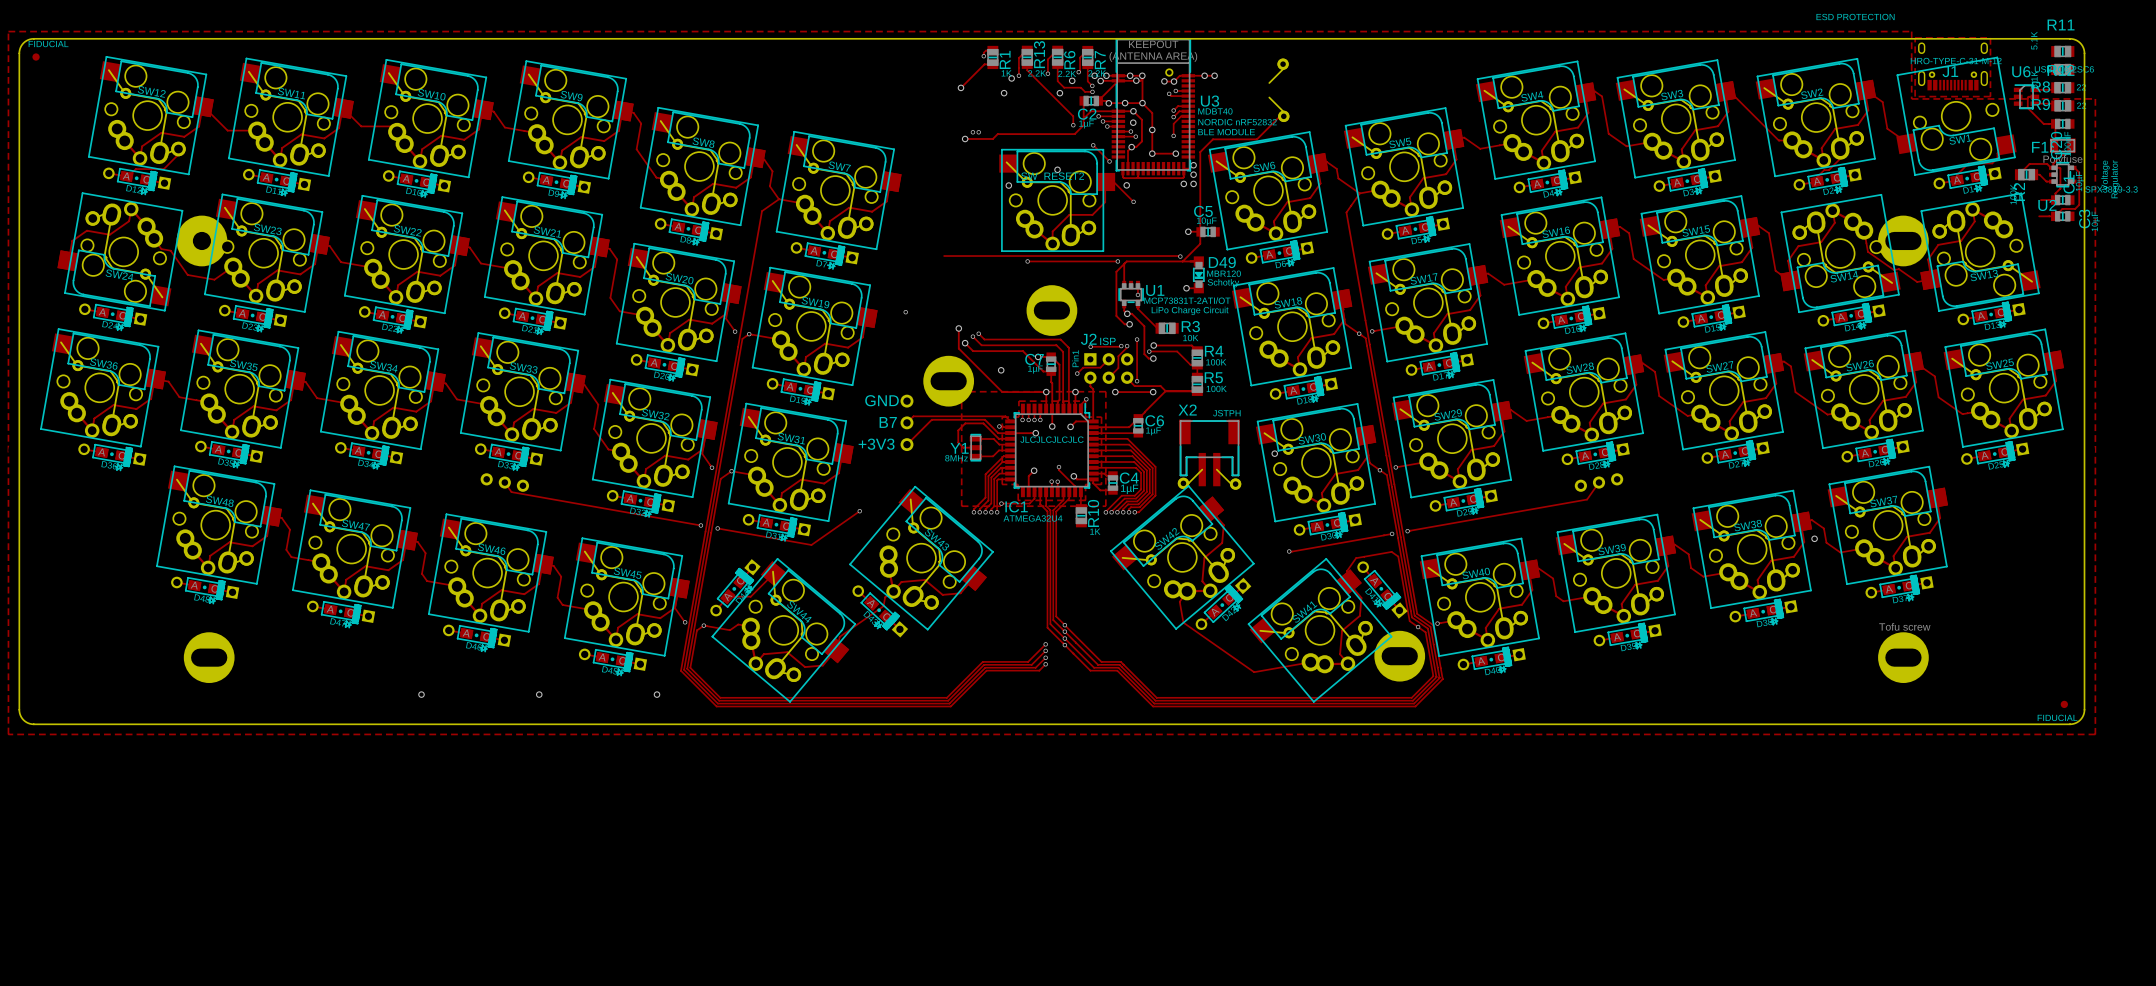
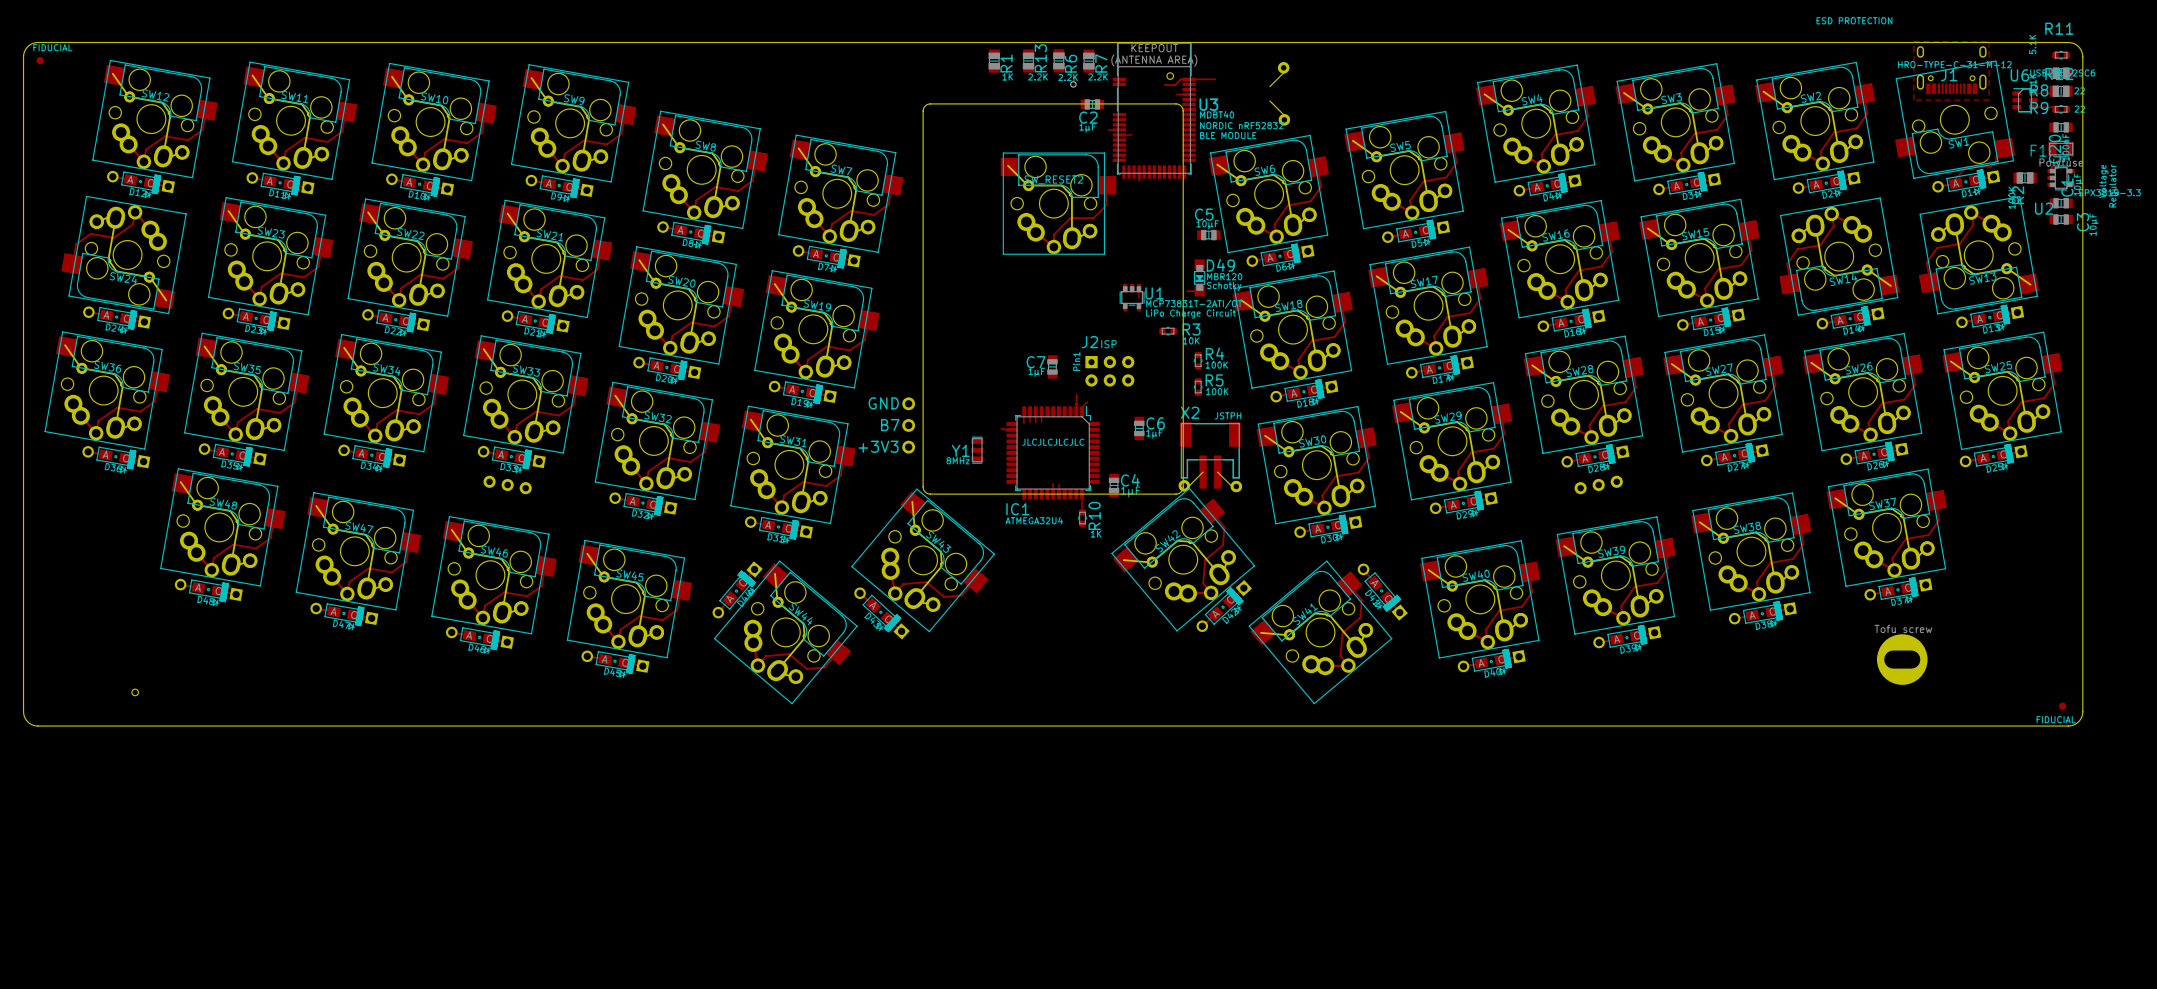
zone outline: (8, 31) (8, 734) (2095, 734) (2095, 98) (1911, 98) (1911, 31) (8, 31) -> none
R11 footprint: [2051, 45, 2075, 58] -> [2052, 51, 2070, 60]
track: (992, 50) (985, 50) (983, 56) -> none
track: (1027, 50) (1018, 58) (1018, 75) -> none
track: (1057, 50) (1047, 59) (1047, 73) -> none
track: (1087, 50) (1080, 57) (1078, 72) -> none
via: (983, 56) -> none
track: (992, 64) (984, 64) (960, 87) -> none
track: (1027, 64) (1027, 70) (1073, 116) (1073, 125) -> none
track: (1057, 64) (1057, 81) (1064, 87) (1080, 87) (1085, 91) (1092, 91) -> none
track: (1091, 67) (1087, 64) (1087, 81) (1092, 85) -> none
via: (1078, 72) -> none
via: (1047, 73) -> none
via: (1018, 75) -> none
via: (1094, 75) -> none
track: (1106, 75) (1142, 75) (1142, 103) (1152, 113) (1152, 153) (1175, 153) -> none
via: (1106, 75) -> none
via: (1130, 75) -> none
via: (1142, 75) -> none
via: (1204, 75) -> none
via: (1214, 75) -> none
via: (1011, 78) -> none
track: (1142, 78) (1140, 80) (1100, 80) -> none
track: (1118, 80) (1098, 100) (1106, 100) (1108, 103) -> none
via: (1136, 80) -> none
via: (1100, 81) -> none
via: (1164, 81) -> none
via: (1174, 81) -> none
via: (1092, 85) -> none
via: (960, 87) -> none
via: (1175, 90) -> none
track: (1865, 90) (1882, 102) (1887, 128) (1908, 143) -> none
via: (1092, 91) -> none
track: (1726, 91) (1729, 91) (1778, 140) (1792, 140) -> none
track: (1586, 92) (1594, 91) (1602, 96) (1608, 133) (1626, 146) (1652, 141) -> none
via: (1004, 93) -> none
via: (1059, 93) -> none
track: (1169, 93) (1171, 96) (1188, 96) -> none
via: (1169, 93) -> none
track: (2034, 96) (2027, 97) (2027, 108) (2043, 123) (2055, 123) (2054, 145) -> none
track: (1083, 99) (1083, 118) -> none
board edge: none -> (930, 103) (1176, 103) (1182, 107) (1183, 486) (1179, 493) (930, 494) (924, 490) (923, 111) (925, 106) (930, 103)
R9 footprint: [2051, 100, 2075, 112] -> [2052, 105, 2070, 114]
via: (1108, 103) -> none
track: (1109, 103) (1142, 103) -> none
via: (1125, 103) -> none
via: (1142, 103) -> none
track: (1188, 106) (1178, 106) (1173, 110) -> none
track: (204, 107) (227, 130) (257, 130) -> none
track: (343, 108) (361, 126) (393, 126) (397, 131) -> none
track: (483, 109) (493, 111) (504, 127) (537, 133) -> none
via: (1173, 110) -> none
track: (623, 111) (633, 112) (641, 123) (636, 149) (656, 177) (669, 179) -> none
via: (1133, 111) -> none
track: (1188, 111) (1179, 111) (1173, 117) -> none
track: (1098, 116) (1118, 116) -> none
via: (1098, 116) -> none
track: (1188, 116) (1181, 116) (1173, 123) (1173, 135) -> none
track: (1283, 116) (1279, 116) (1256, 139) (1212, 139) (1200, 152) (1200, 243) (1182, 261) -> none
via: (1173, 117) -> none
via: (1102, 121) -> none
track: (1103, 121) (1118, 121) -> none
via: (1133, 122) -> none
via: (1073, 125) -> none
track: (1083, 125) (1074, 134) (997, 134) (992, 138) (965, 138) -> none
track: (1083, 125) (1083, 118) (1091, 111) (1133, 111) (1141, 119) (1141, 141) (1136, 147) (1131, 147) -> none
via: (1107, 126) -> none
via: (1152, 129) -> none
via: (1130, 131) -> none
via: (972, 132) -> none
via: (978, 132) -> none
via: (1173, 135) -> none
track: (1118, 136) (1135, 136) -> none
via: (1135, 136) -> none
via: (965, 138) -> none
track: (1453, 139) (1464, 137) (1480, 148) (1512, 143) -> none
track: (1093, 145) (1109, 161) -> none
via: (1093, 145) -> none
track: (1131, 146) (1128, 150) (1128, 168) -> none
via: (1131, 147) -> none
track: (1840, 148) (1840, 158) (1828, 170) (1824, 170) (1817, 177) (1817, 181) -> none
track: (178, 149) (178, 154) (163, 169) (135, 169) (126, 176) -> none
via: (1152, 153) -> none
via: (1175, 153) -> none
track: (756, 158) (764, 159) (772, 171) (769, 186) (778, 199) (804, 203) -> none
via: (1109, 161) -> none
track: (1318, 163) (1327, 162) (1336, 168) (1338, 178) (1359, 193) (1380, 189) -> none
track: (1193, 165) (1190, 168) (1183, 168) (1182, 178) (1123, 178) (1122, 168) -> none
via: (1193, 165) -> none
track: (2072, 167) (2079, 172) (2079, 204) (2075, 208) (2062, 208) (2055, 216) (2039, 216) -> none
via: (1057, 169) -> none
via: (1193, 174) -> none
track: (2019, 174) (2029, 163) (2047, 163) (2050, 167) (2060, 168) (2060, 188) (2055, 193) (2055, 200) (2041, 200) -> none
track: (2033, 174) (2039, 174) (2046, 181) (2053, 181) -> none
track: (1106, 182) (1114, 182) (1133, 201) -> none
via: (1183, 183) -> none
via: (1193, 183) -> none
via: (1008, 185) -> none
via: (1126, 185) -> none
track: (1359, 193) (1346, 212) (1417, 613) (1433, 625) -> none
track: (779, 199) (762, 211) (680, 670) (716, 706) (950, 706) (986, 670) (1039, 670) (1045, 664) -> none
via: (1133, 201) -> none
track: (1750, 227) (1758, 226) (1768, 233) (1775, 270) (1789, 280) -> none
track: (1609, 228) (1620, 226) (1629, 233) (1633, 258) (1663, 279) (1676, 277) -> none
track: (1864, 230) (1867, 251) (1893, 270) (1898, 269) (1917, 281) (1930, 279) -> none
track: (1188, 231) (1200, 231) -> none
via: (1188, 231) -> none
track: (154, 238) (161, 249) (170, 250) (187, 274) (214, 279) (233, 266) -> none
part: (201, 240) -> none
part: (1903, 240) -> none
track: (319, 244) (329, 246) (341, 262) (373, 267) -> none
track: (459, 245) (469, 247) (480, 263) (513, 269) -> none
track: (599, 246) (609, 248) (617, 259) (610, 297) (619, 311) (645, 315) -> none
track: (944, 256) (1180, 256) -> none
via: (1180, 256) -> none
track: (1027, 261) (1117, 261) -> none
via: (1027, 261) -> none
via: (1117, 261) -> none
track: (1198, 261) (1126, 261) (1116, 271) (1116, 315) (1124, 324) (1129, 324) -> none
track: (1124, 263) (1124, 285) -> none
track: (1477, 275) (1488, 273) (1504, 284) (1536, 279) -> none
via: (1186, 288) -> none
track: (732, 294) (730, 295) (726, 318) (735, 331) -> none
via: (1137, 294) -> none
track: (1341, 299) (1345, 324) (1365, 338) (1414, 615) (1430, 626) (1439, 678) (1414, 703) (1154, 703) (1118, 667) (1094, 667) (1050, 624) (1050, 510) (1046, 506) (1046, 491) -> none
track: (1124, 304) (1124, 310) (1127, 313) (1131, 313) (1144, 326) (1144, 354) (1148, 358) (1153, 358) -> none
track: (1137, 304) (1137, 308) (1157, 328) (1160, 328) -> none
part: (1051, 310) -> none
via: (905, 312) -> none
via: (1127, 313) -> none
R3 footprint: [1155, 322, 1179, 335] -> [1159, 327, 1177, 336]
via: (1129, 324) -> none
track: (1404, 325) (1372, 331) -> none
track: (958, 328) (958, 348) (1002, 392) (1046, 392) (1046, 409) -> none
via: (958, 328) -> none
via: (735, 331) -> none
via: (1372, 331) -> none
track: (978, 333) (984, 339) (1060, 339) (1068, 347) (1069, 409) -> none
via: (978, 333) -> none
via: (1359, 333) -> none
via: (749, 334) -> none
track: (972, 336) (981, 345) (1056, 345) (1063, 351) (1063, 409) -> none
via: (972, 336) -> none
track: (781, 339) (749, 334) (742, 338) (684, 669) (717, 703) (949, 703) (985, 667) (1035, 667) (1045, 657) -> none
track: (1137, 339) (1137, 381) -> none
via: (1137, 339) -> none
track: (965, 343) (973, 351) (1022, 351) (1043, 371) (1051, 371) (1052, 426) -> none
via: (965, 343) -> none
track: (1153, 345) (1191, 345) (1197, 351) -> none
via: (1153, 345) -> none
via: (1090, 346) -> none
track: (1121, 346) (1090, 346) -> none
via: (1121, 346) -> none
track: (1127, 346) (1118, 356) (1118, 368) (1108, 377) -> none
via: (1127, 346) -> none
R4 footprint: [1191, 346, 1204, 370] -> [1194, 351, 1203, 370]
track: (1149, 351) (1177, 351) (1190, 364) (1197, 364) (1197, 377) -> none
via: (1149, 351) -> none
track: (1038, 356) (1051, 356) (1059, 364) (1057, 409) -> none
via: (1038, 356) -> none
via: (1153, 358) -> none
track: (1108, 359) (1100, 367) (1083, 367) (1077, 373) -> none
track: (1914, 362) (1934, 376) (1938, 397) (1962, 414) (1980, 411) -> none
track: (1773, 363) (1784, 361) (1790, 366) (1795, 392) (1827, 414) (1840, 412) -> none
track: (1634, 364) (1642, 363) (1655, 371) (1659, 396) (1687, 415) (1700, 413) -> none
via: (1001, 370) -> none
R5 footprint: [1191, 372, 1204, 396] -> [1194, 378, 1203, 396]
via: (1077, 373) -> none
track: (1090, 377) (1090, 386) (1093, 389) (1093, 421) (1075, 421) (1070, 426) -> none
track: (1127, 377) (1134, 386) (1160, 386) (1165, 391) -> none
track: (156, 379) (168, 381) (179, 397) (209, 402) -> none
track: (295, 380) (305, 382) (317, 398) (349, 403) -> none
track: (435, 381) (445, 383) (456, 399) (489, 405) -> none
part: (948, 381) -> none
via: (1137, 381) -> none
track: (576, 383) (584, 384) (598, 404) (594, 428) (608, 449) (621, 451) -> none
zone outline: (961, 391) (961, 506) (1105, 506) (1105, 391) (961, 391) -> none
track: (1197, 391) (1165, 391) (1129, 427) (1093, 427) -> none
via: (1046, 392) -> none
via: (1075, 392) -> none
track: (1115, 392) (1153, 392) -> none
via: (1115, 392) -> none
via: (1153, 392) -> none
via: (1086, 399) -> none
zone outline: (1018, 401) (1085, 401) (1085, 417) (1101, 417) (1101, 484) (1085, 484) (1085, 500) (1018, 500) (1018, 484) (1002, 484) (1002, 417) (1018, 417) (1018, 401) -> none
track: (1502, 411) (1510, 409) (1526, 420) (1560, 415) -> none
via: (1022, 419) -> none
via: (1028, 419) -> none
via: (1034, 419) -> none
via: (1040, 419) -> none
track: (1010, 421) (1005, 416) (913, 416) (906, 422) -> none
via: (999, 426) -> none
via: (1052, 426) -> none
via: (1070, 426) -> none
track: (707, 429) (702, 453) (712, 467) -> none
track: (1035, 433) (998, 433) (984, 419) (931, 419) (906, 444) -> none
via: (1035, 433) -> none
track: (1093, 433) (1138, 433) -> none
track: (1365, 435) (1369, 463) (1386, 475) (1411, 617) (1427, 628) (1436, 677) (1412, 700) (1155, 700) (1119, 664) (1098, 664) (1053, 620) (1053, 510) (1063, 500) (1063, 491) -> none
track: (975, 438) (993, 438) (999, 444) (1010, 444) -> none
track: (1010, 438) (998, 438) (983, 423) (965, 423) (958, 430) (958, 442) (963, 447) (975, 447) -> none
track: (1093, 438) (1127, 438) (1155, 466) (1155, 495) (1138, 512) (1134, 512) -> none
track: (1093, 444) (1129, 444) (1152, 468) (1152, 494) (1139, 507) (1130, 507) (1129, 512) -> none
track: (1010, 450) (999, 450) (993, 456) (975, 456) -> none
track: (1094, 451) (1093, 450) (1130, 450) (1149, 469) (1149, 493) (1138, 504) (1128, 504) (1123, 509) (1123, 512) -> none
via: (1274, 453) -> none
track: (1010, 456) (1003, 456) (985, 474) (985, 497) (973, 509) (973, 512) -> none
track: (1094, 457) (1093, 456) (1132, 456) (1146, 470) (1146, 491) (1137, 501) (1126, 501) (1117, 512) -> none
track: (1428, 461) (1395, 467) -> none
track: (1010, 462) (1002, 462) (988, 476) (988, 500) (979, 509) (979, 512) -> none
track: (1093, 462) (1134, 462) (1143, 471) (1143, 490) (1136, 498) (1124, 498) (1111, 512) -> none
via: (712, 467) -> none
track: (1010, 467) (1001, 467) (991, 477) (991, 503) (985, 509) (985, 512) -> none
track: (1058, 467) (1058, 470) (1075, 486) (1075, 491) -> none
via: (1058, 467) -> none
via: (1395, 467) -> none
track: (1093, 468) (1136, 467) (1141, 472) (1141, 489) (1134, 495) (1121, 495) (1105, 512) -> none
track: (1034, 470) (1028, 476) (1028, 491) -> none
via: (1034, 470) -> none
via: (1379, 470) -> none
via: (731, 471) -> none
track: (1010, 473) (999, 473) (994, 478) (994, 506) (991, 512) -> none
track: (1093, 473) (1112, 475) -> none
track: (757, 475) (731, 471) (720, 478) (687, 668) (719, 700) (948, 700) (984, 664) (1031, 664) (1045, 650) -> none
track: (1073, 476) (1076, 479) (1093, 479) (1093, 483) (1100, 490) (1112, 490) -> none
via: (1073, 476) -> none
track: (1010, 479) (997, 480) (997, 512) -> none
via: (1051, 481) -> none
via: (1057, 481) -> none
track: (504, 482) (511, 492) (700, 525) -> none
track: (1599, 482) (1587, 499) (1407, 531) -> none
track: (1035, 490) (1034, 498) (1029, 503) (1001, 503) -> none
track: (1040, 491) (1040, 504) (1047, 511) (1047, 627) (1090, 670) (1117, 670) -> none
track: (1069, 491) (1069, 498) (1056, 511) (1056, 616) (1064, 625) -> none
via: (1001, 503) -> none
R10 footprint: [1075, 504, 1088, 528] -> [1078, 509, 1087, 527]
track: (859, 511) (811, 544) (717, 528) -> none
via: (859, 511) -> none
via: (973, 512) -> none
via: (979, 512) -> none
via: (985, 512) -> none
via: (991, 512) -> none
via: (997, 512) -> none
via: (1105, 512) -> none
via: (1111, 512) -> none
via: (1117, 512) -> none
via: (1123, 512) -> none
via: (1129, 512) -> none
via: (1134, 512) -> none
track: (271, 516) (281, 518) (289, 529) (286, 549) (291, 557) (321, 562) -> none
track: (1801, 522) (1811, 520) (1823, 528) (1826, 542) (1840, 552) (1864, 548) -> none
via: (700, 525) -> none
via: (717, 528) -> none
via: (1407, 531) -> none
track: (1392, 533) (1383, 535) -> none
via: (1392, 533) -> none
track: (1384, 535) (1289, 552) -> none
via: (1814, 538) -> none
track: (407, 540) (417, 542) (425, 553) (421, 573) (427, 581) (457, 586) -> none
track: (1666, 546) (1674, 544) (1688, 554) (1691, 568) (1703, 576) (1728, 572) -> none
via: (1289, 551) -> none
track: (543, 564) (553, 566) (561, 576) (557, 597) (562, 604) (593, 610) -> none
track: (1530, 570) (1538, 568) (1553, 578) (1556, 596) (1563, 601) (1592, 596) -> none
track: (773, 573) (750, 596) (734, 596) -> none
track: (1349, 582) (1347, 571) (1356, 558) (1391, 551) (1398, 556) (1409, 621) (1425, 632) (1433, 676) (1411, 697) (1156, 697) (1120, 661) (1101, 661) (1064, 625) -> none
track: (680, 588) (675, 608) (685, 622) -> none
track: (893, 591) (885, 597) (883, 606) (839, 636) (837, 651) -> none
track: (1187, 591) (1179, 601) (1183, 622) (1254, 672) (1310, 662) -> none
track: (1456, 620) (1437, 623) -> none
via: (685, 622) -> none
via: (1437, 623) -> none
via: (703, 625) -> none
via: (1064, 625) -> none
track: (1433, 625) (1442, 679) (1415, 706) (1153, 706) (1117, 670) -> none
track: (750, 626) (738, 624) (730, 630) (703, 625) (696, 630) (690, 667) (720, 697) (946, 697) (982, 661) (1028, 661) (1045, 644) -> none
via: (1418, 627) -> none
via: (1064, 631) -> none
via: (1064, 638) -> none
via: (1045, 644) -> none
via: (1064, 645) -> none
via: (1045, 650) -> none
part: (1399, 656) -> none
part: (209, 657) -> none
via: (1045, 657) -> none
via: (1045, 664) -> none
part: none -> (135, 692)
via: (421, 694) -> none
via: (539, 694) -> none
via: (657, 694) -> none

